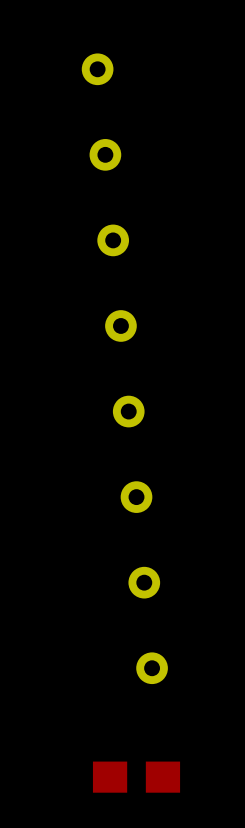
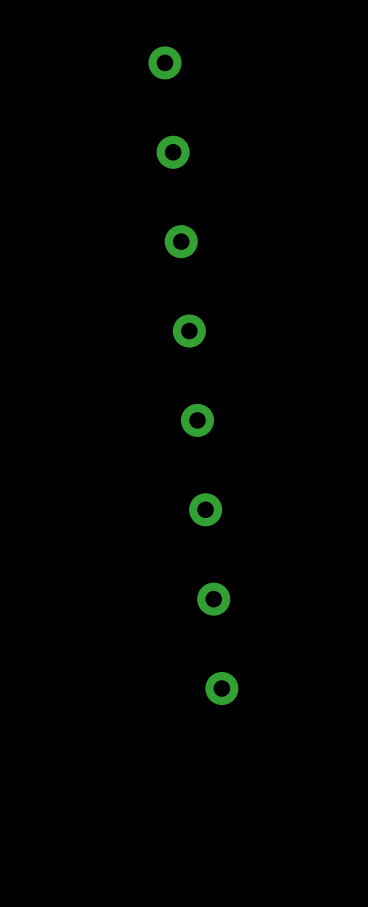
part: (136, 777) -> none

